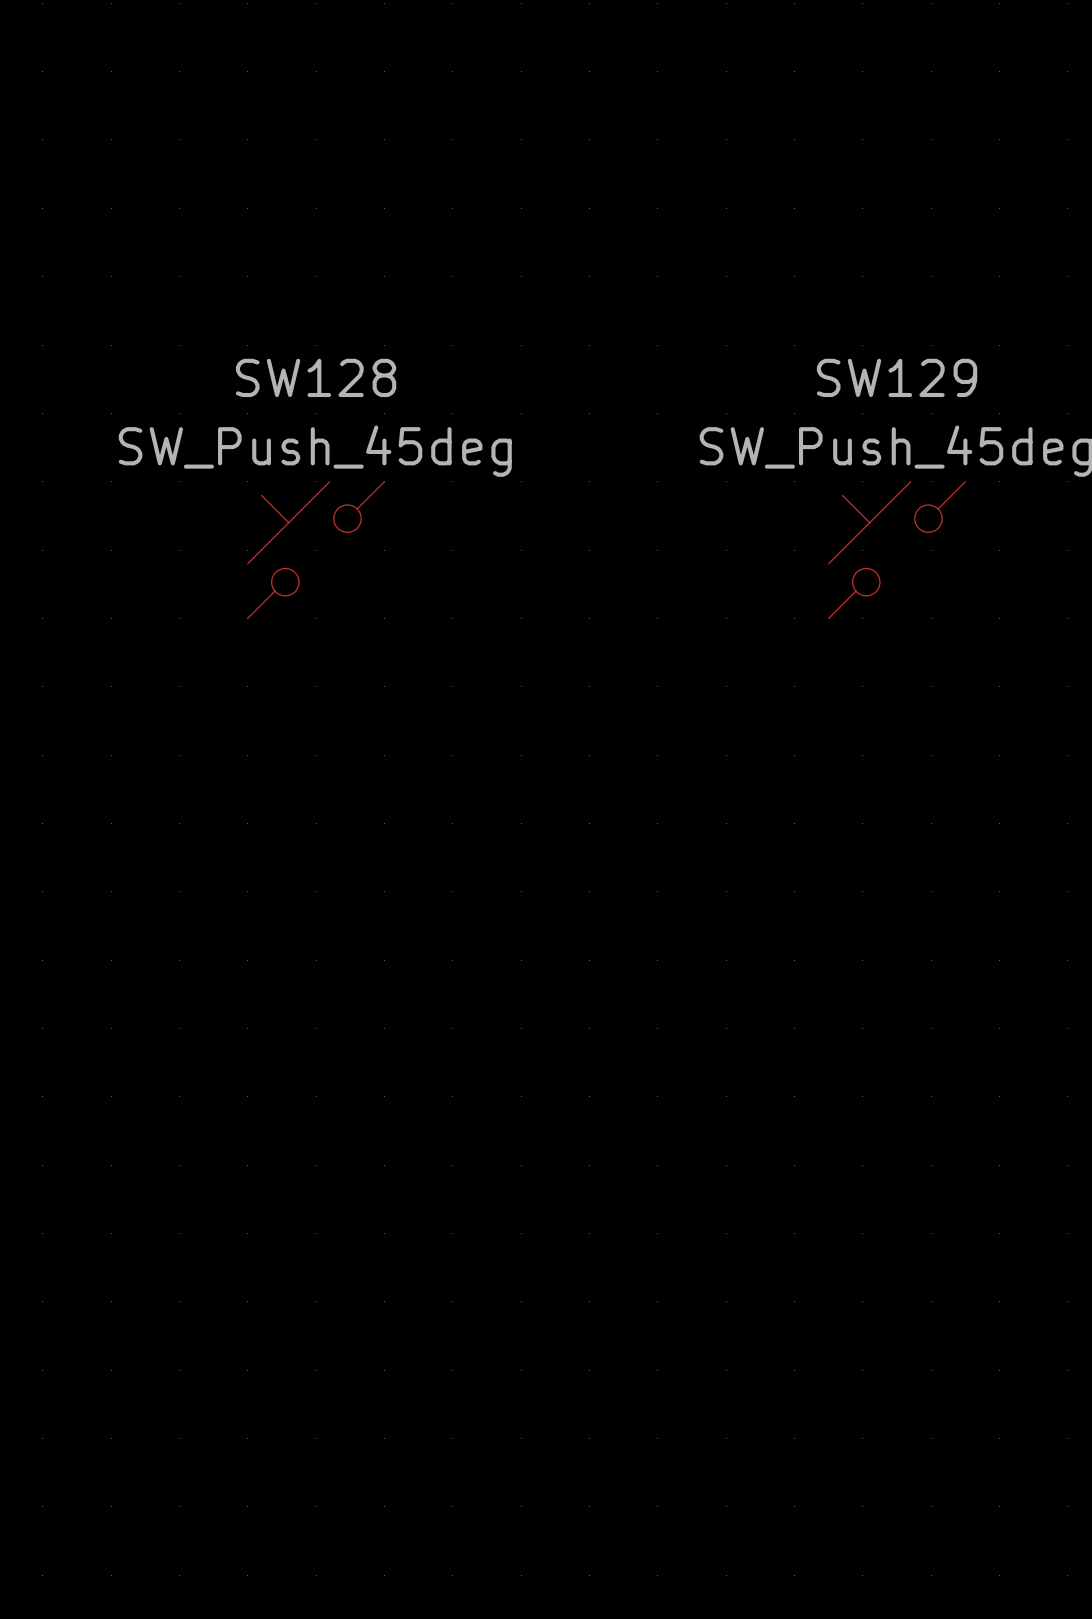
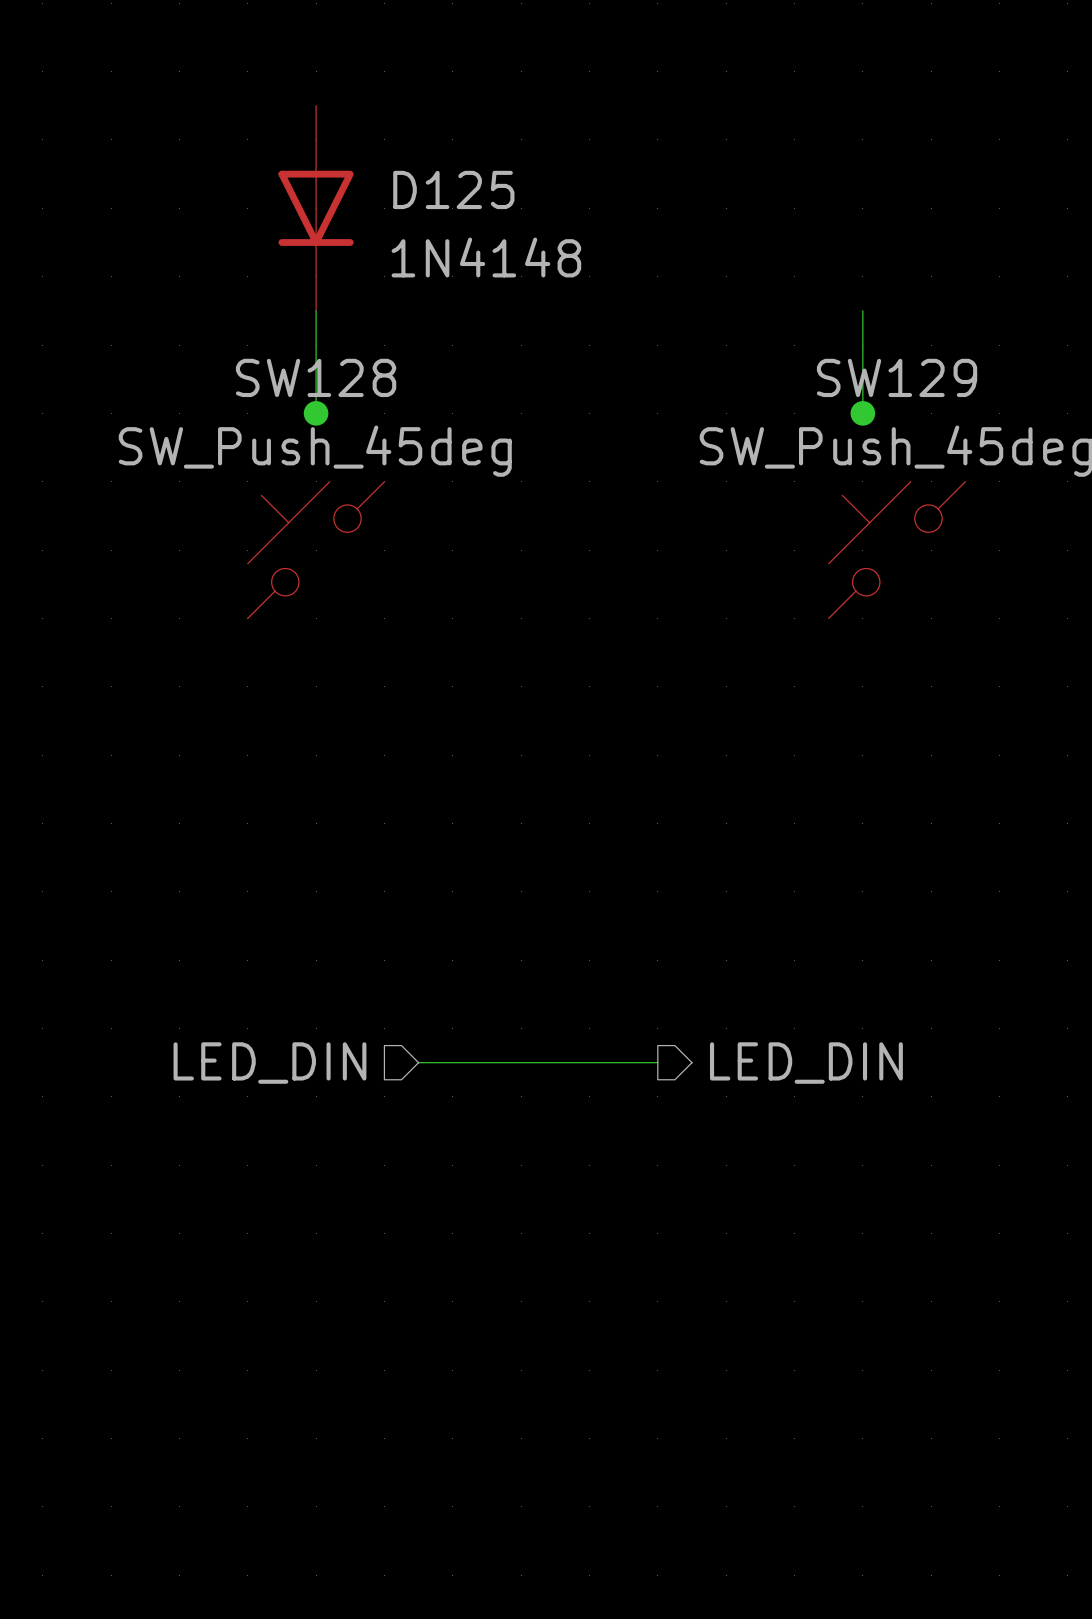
D125: none -> 1N4148 (316, 208)
wire: none -> (316, 310) (316, 413)
wire: none -> (862, 310) (862, 413)
junction: none -> (316, 413)
junction: none -> (862, 413)
wire: none -> (418, 1062) (657, 1062)
hierarchical label: none -> LED_DIN (269, 1063)
sheet pin: none -> LED_DIN (806, 1063)

